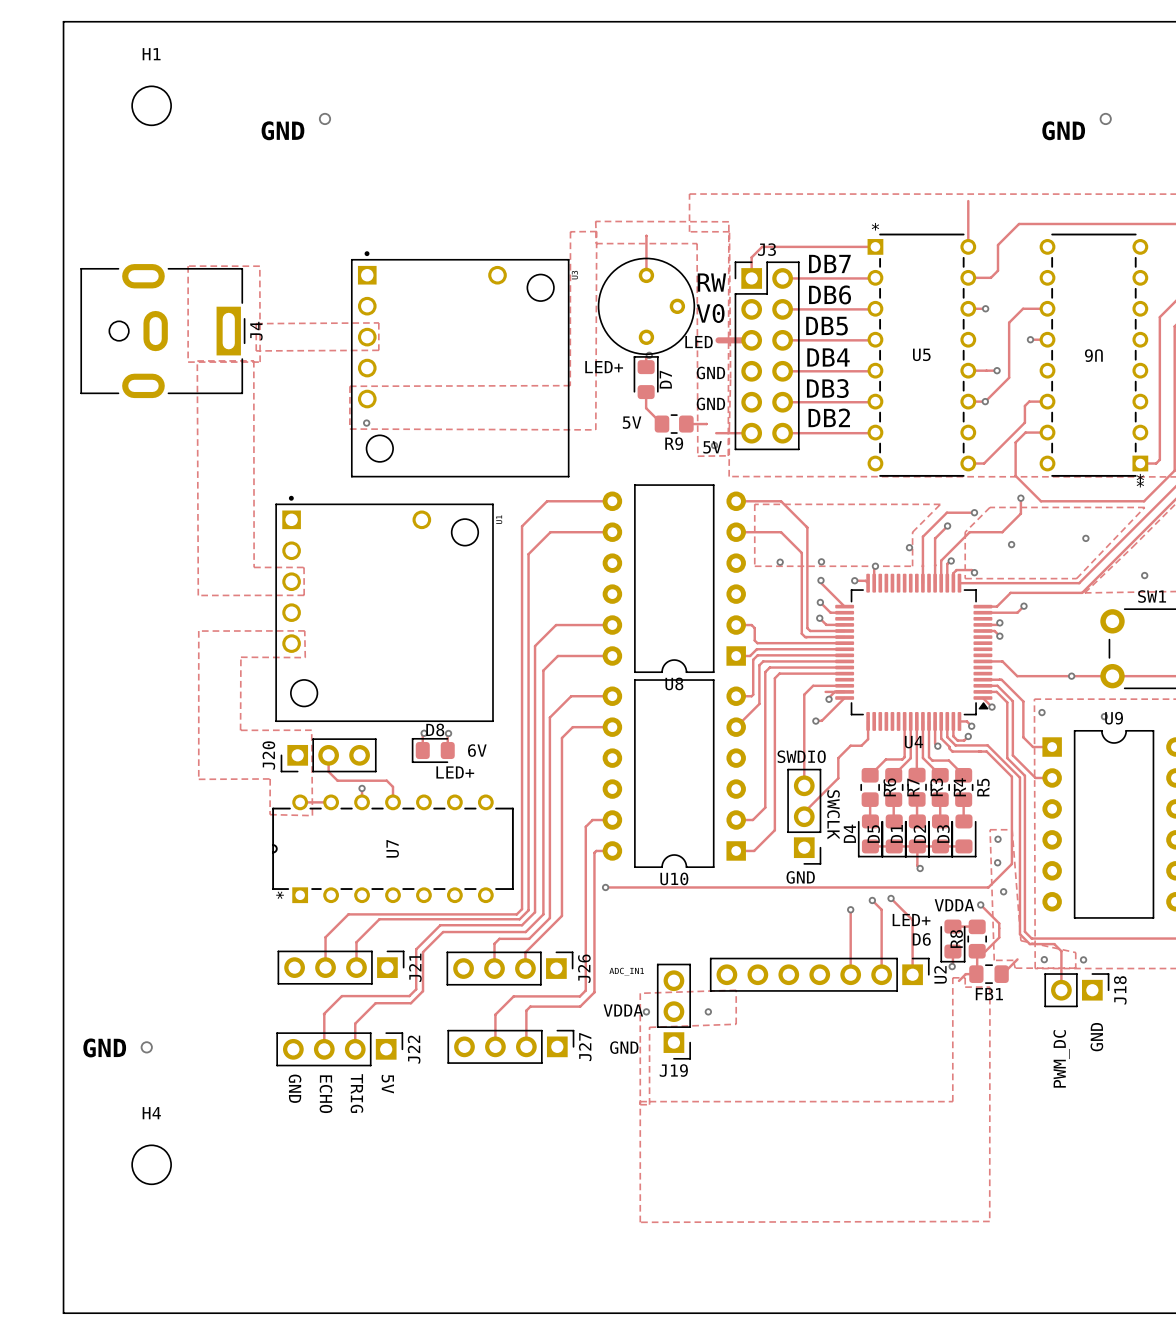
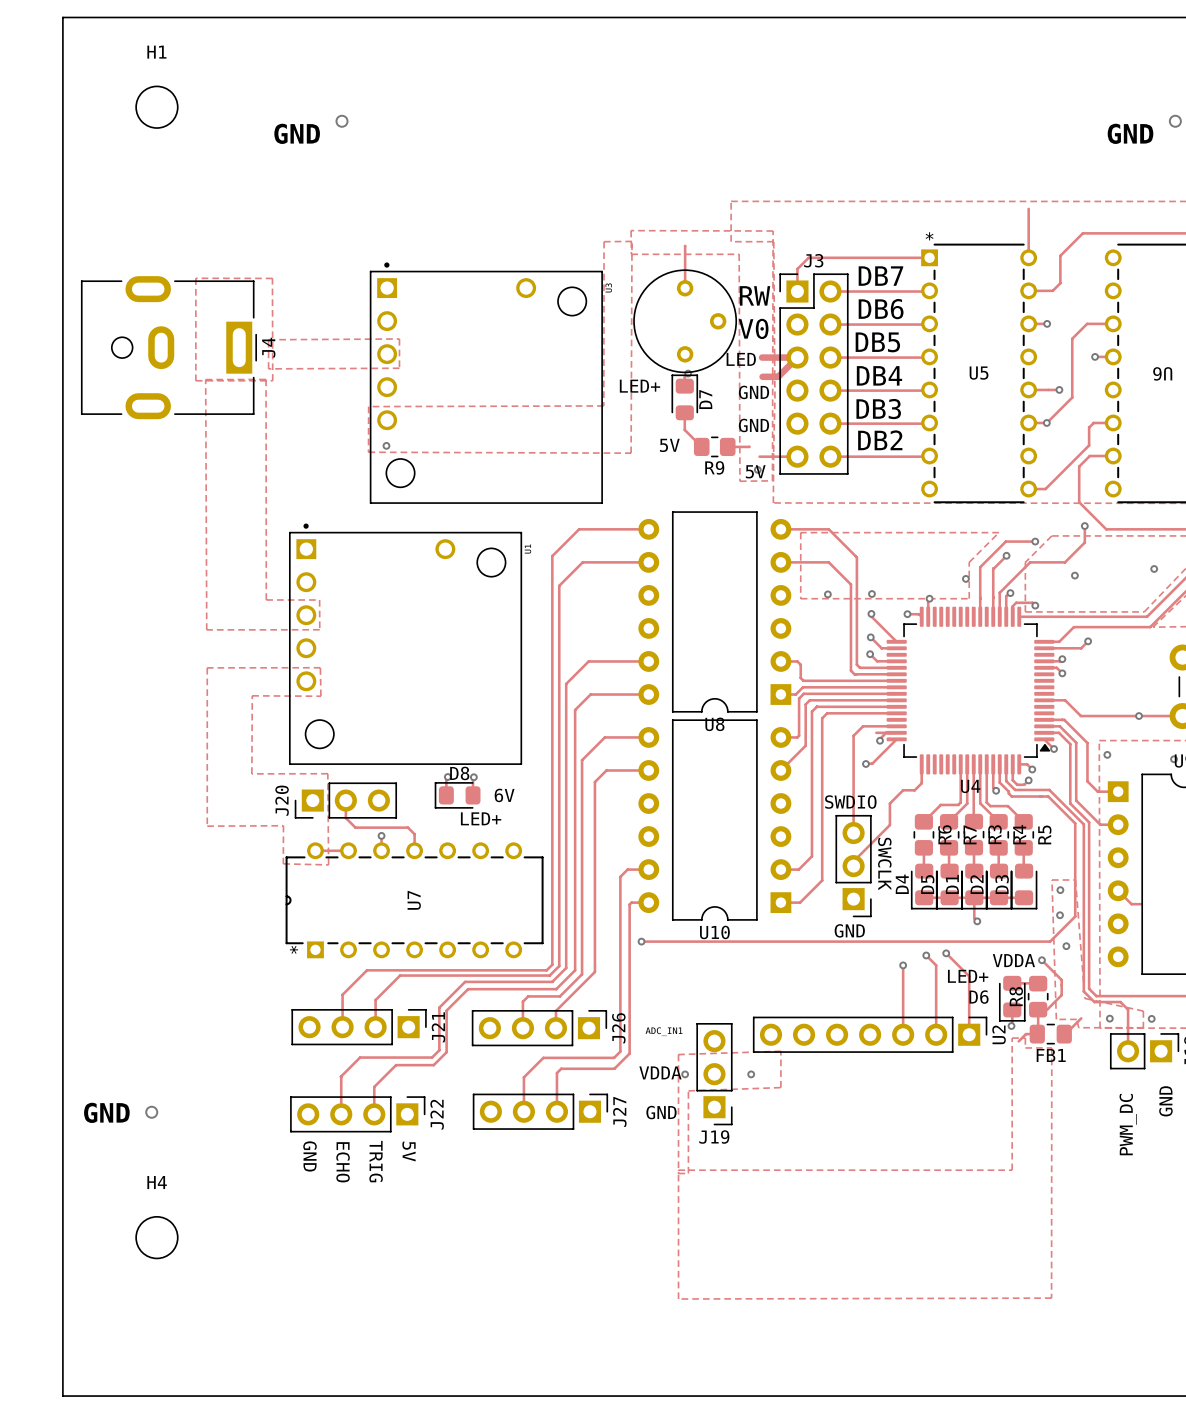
track: none -> (797, 357) (778, 376) (762, 376)
track: none -> (1118, 890) (1131, 904) (1141, 904)

